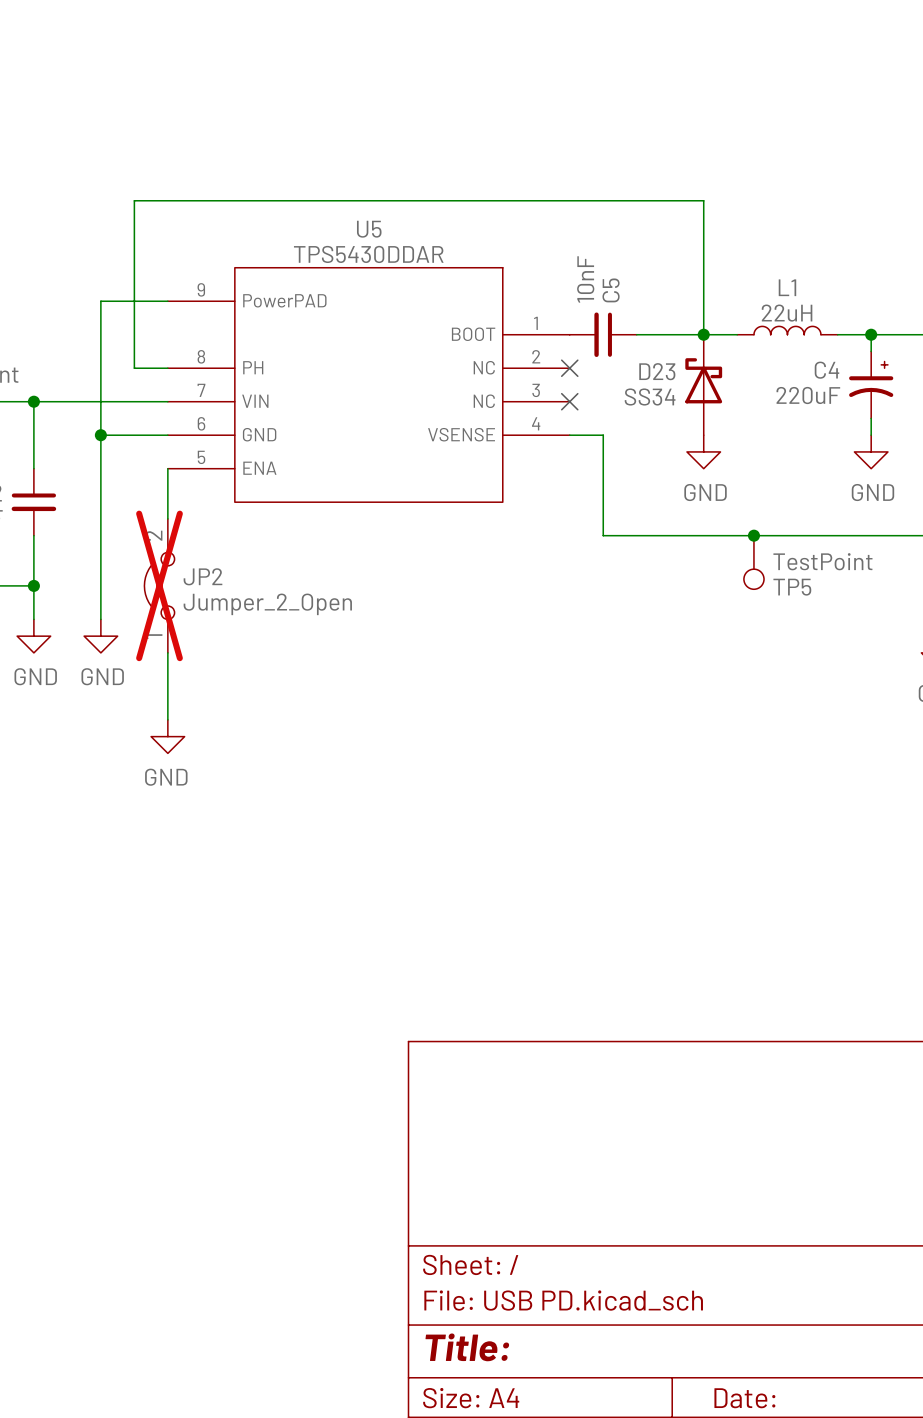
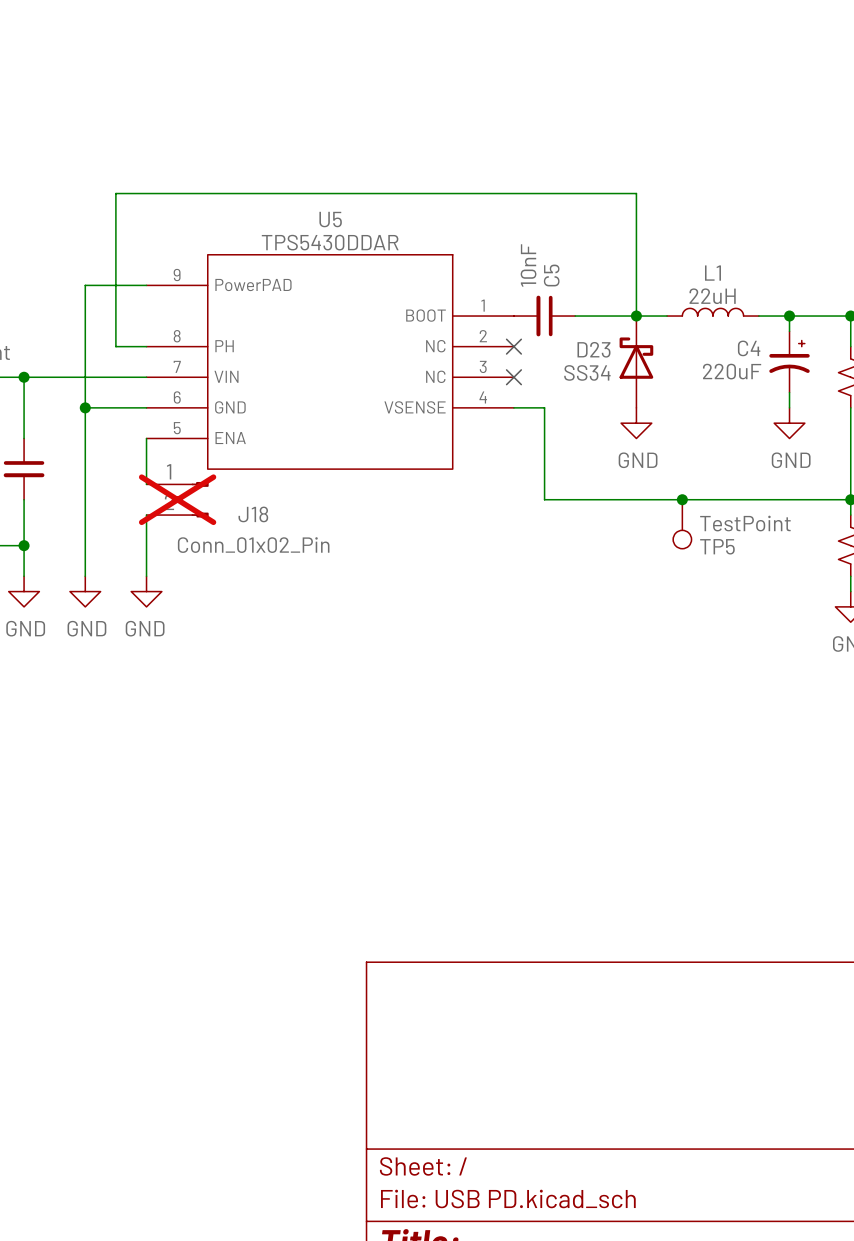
J18: none -> Conn_01x02_Pin (177, 499)
JP2: Jumper_2_Open (159, 585) -> none
wire: (167, 652) (167, 719) -> (146, 515) (146, 576)
power symbol position: GND (167, 736) -> GND (146, 591)

